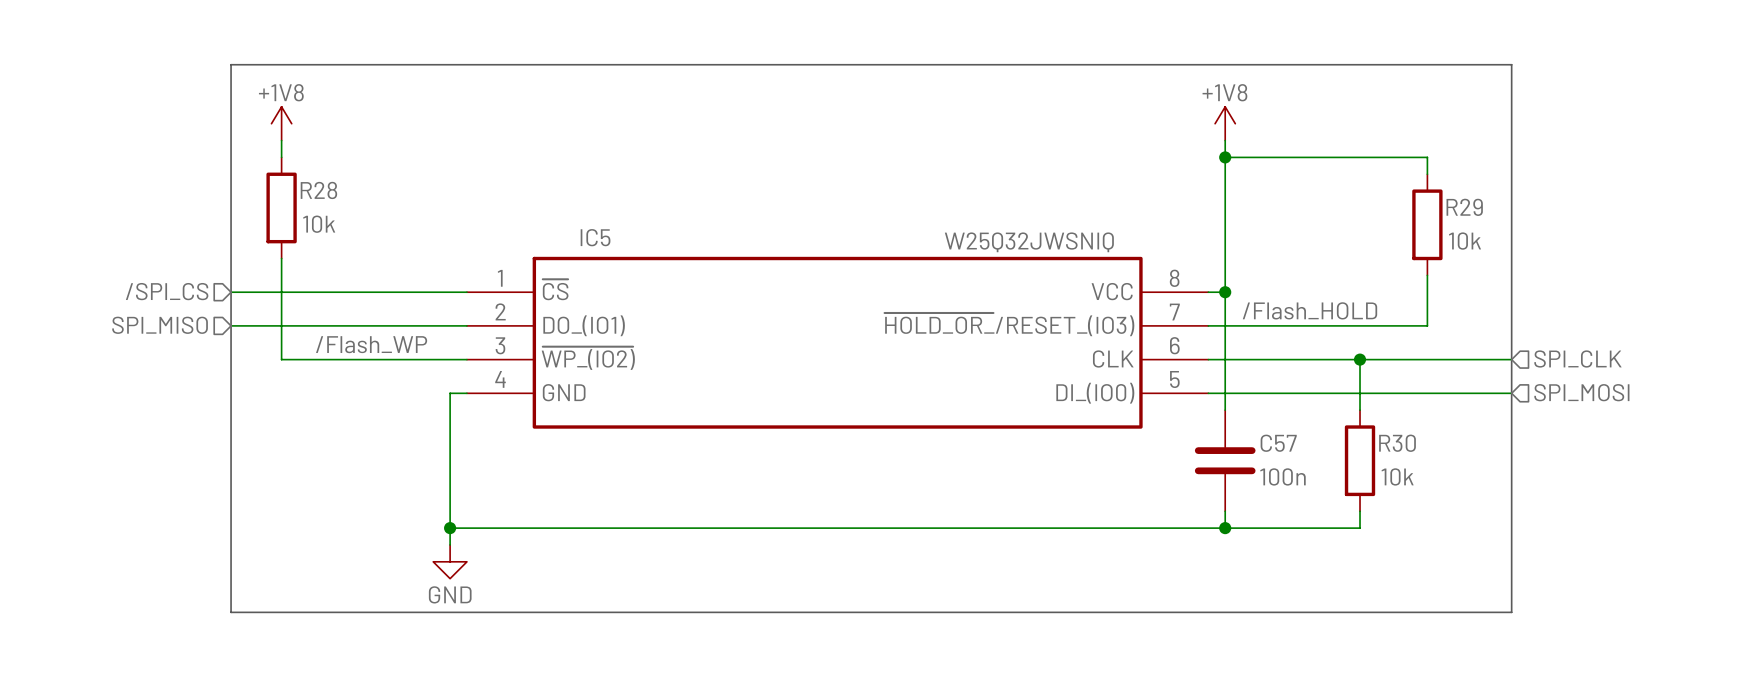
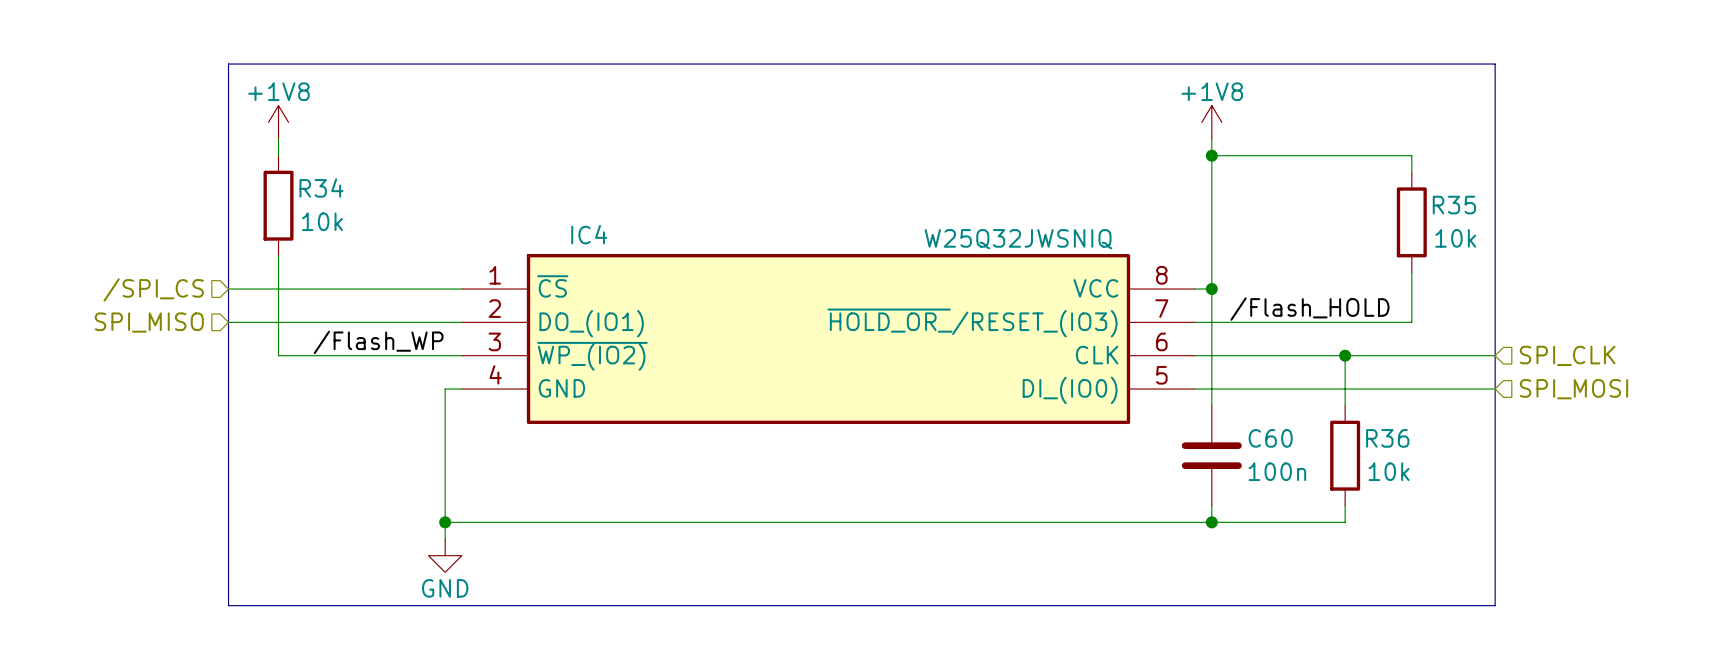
R28 name: R28 (318, 190) -> R34 (321, 188)
R29 name: R29 (1464, 207) -> R35 (1454, 205)
IC5 name: IC5 (595, 237) -> IC4 (589, 234)
C57 name: C57 (1278, 443) -> C60 (1270, 438)
R30 name: R30 (1397, 443) -> R36 (1387, 438)

